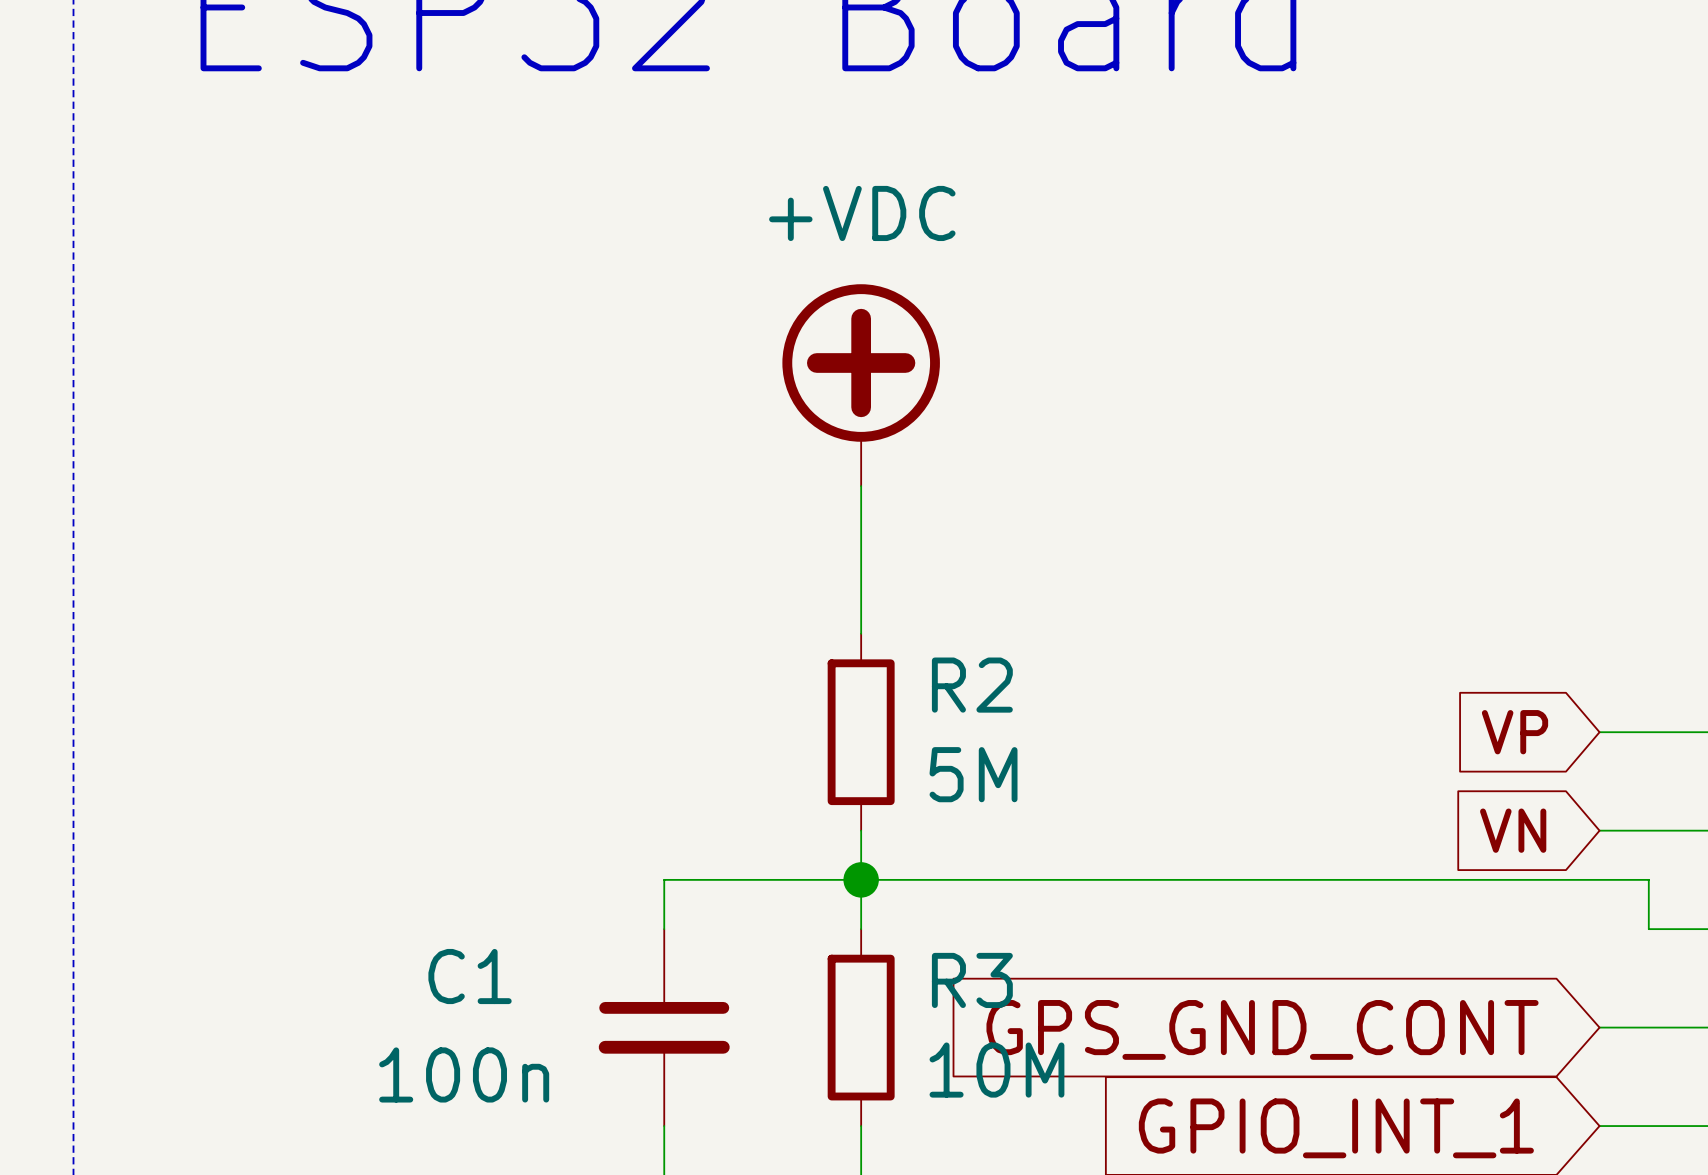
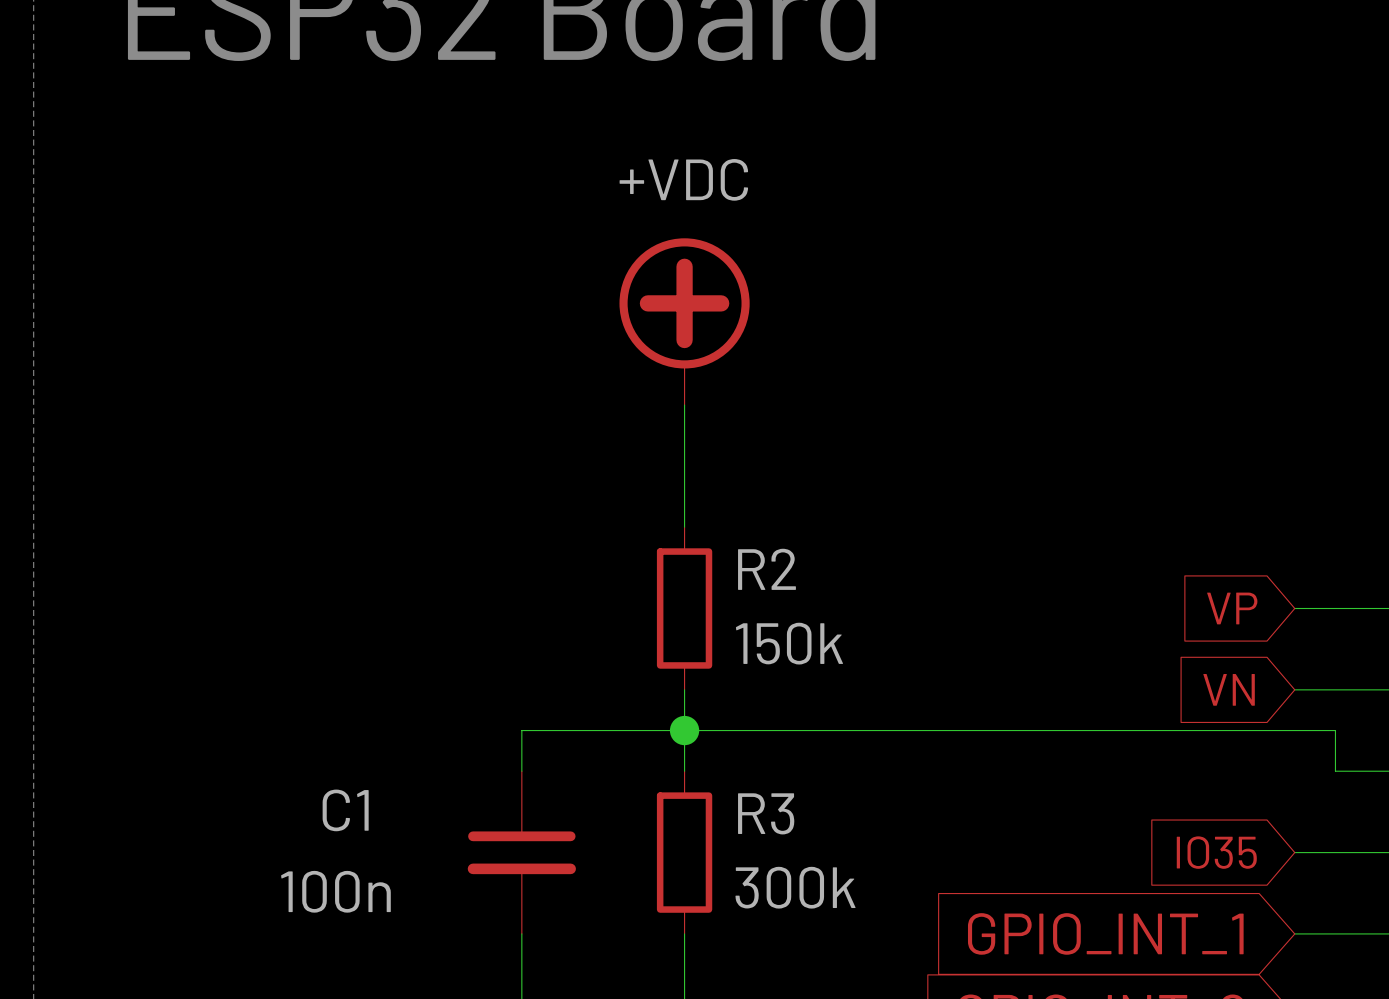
R2 value: 5M (973, 774) -> 150k (789, 643)
global label: GPS_GND_CONT (1262, 1029) -> IO35 (1216, 852)
R3 value: 10M (996, 1070) -> 300k (795, 887)

